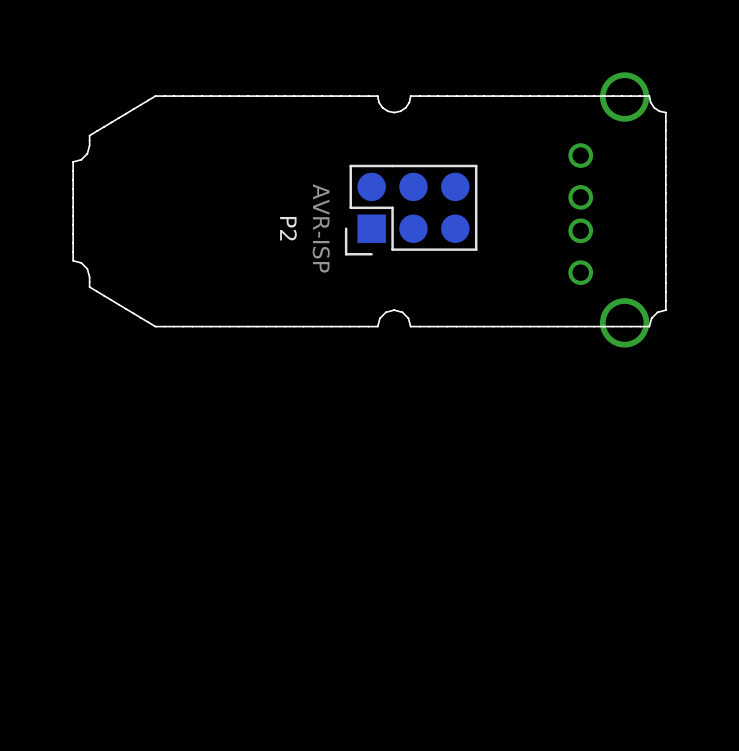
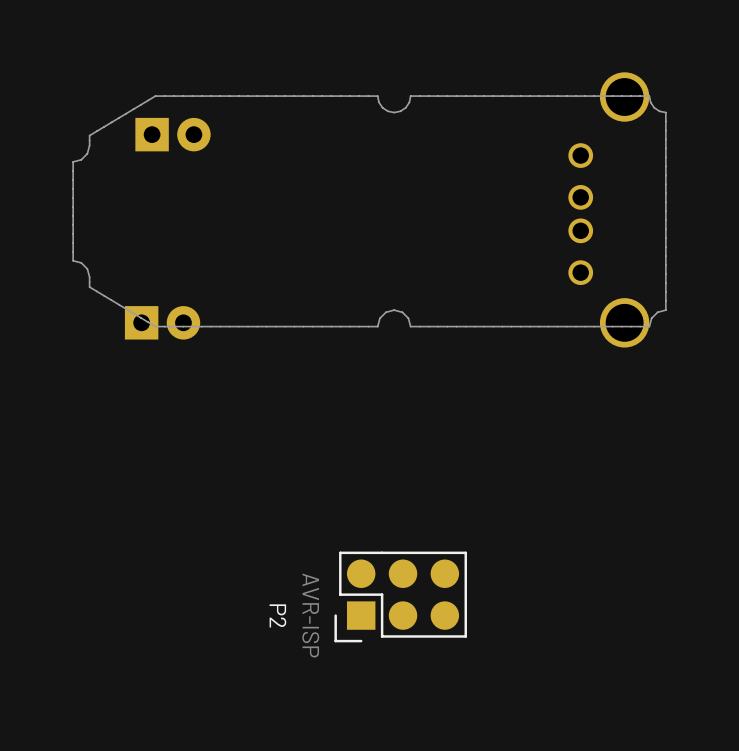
part: none -> (173, 134)
P2 position: (411, 210) -> (400, 596)
part: none -> (162, 322)

